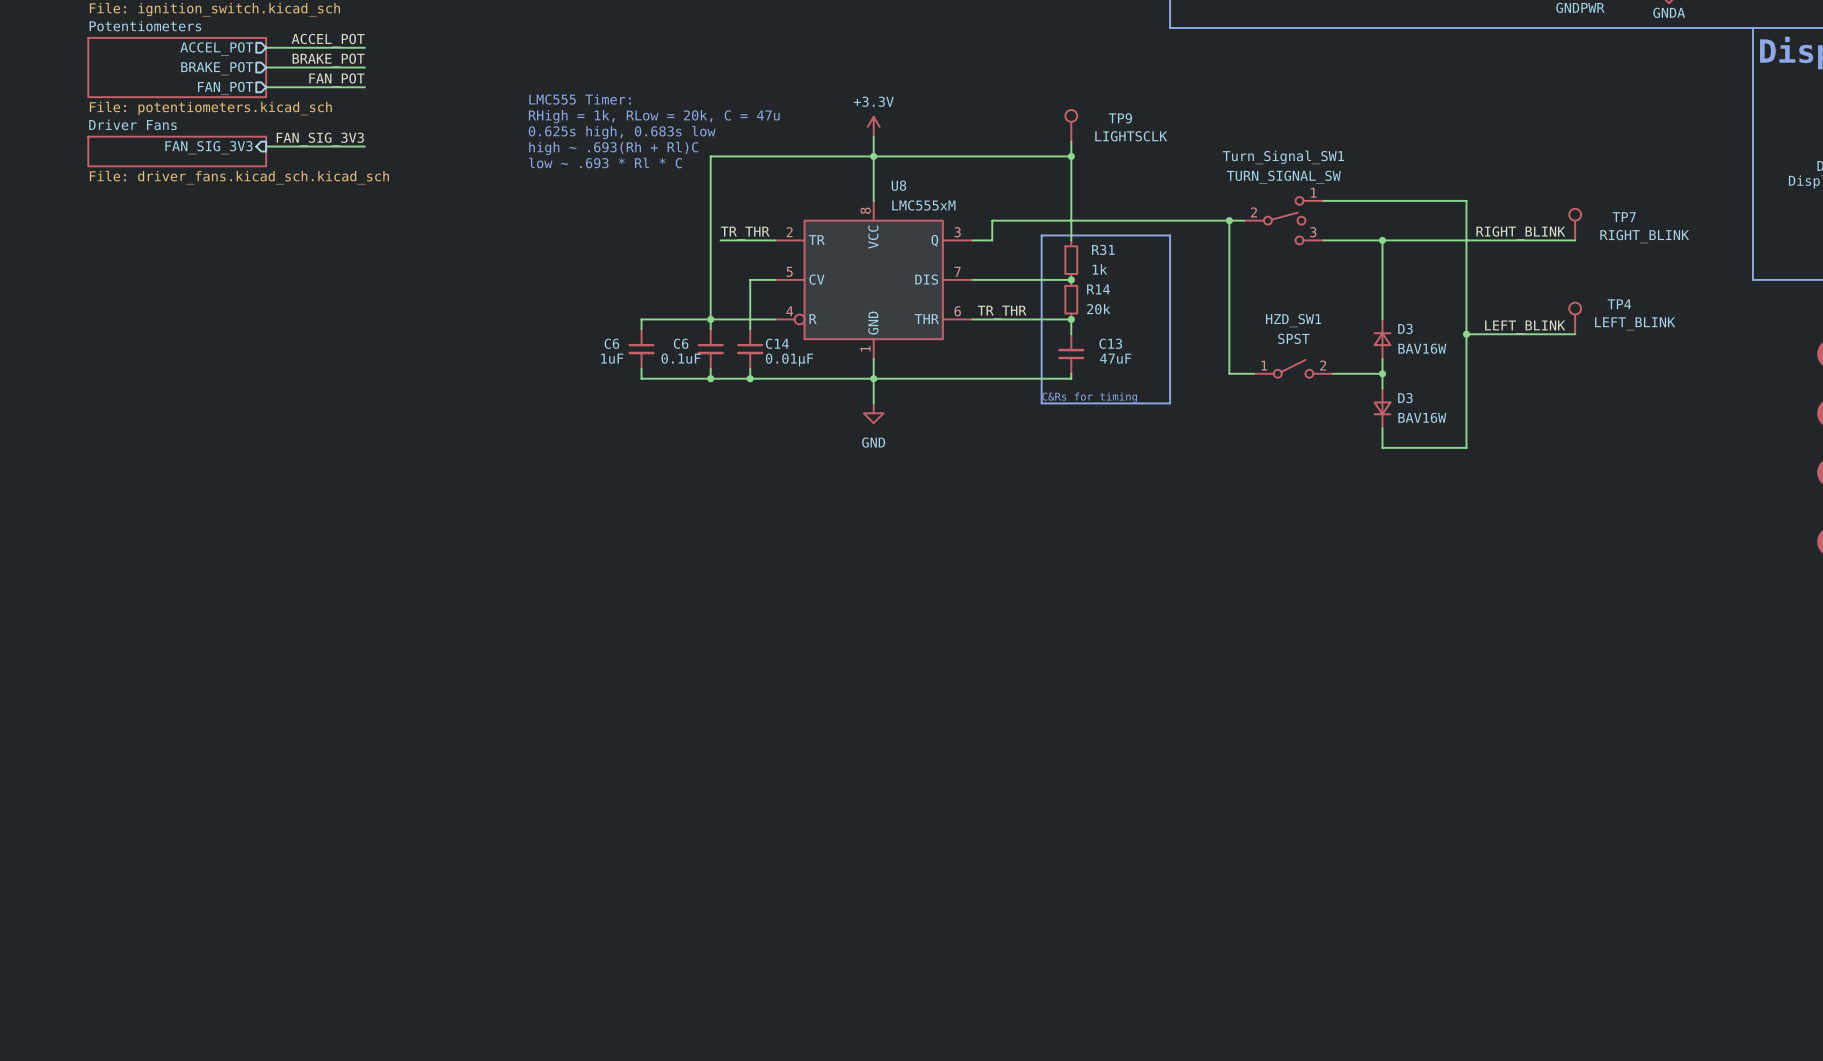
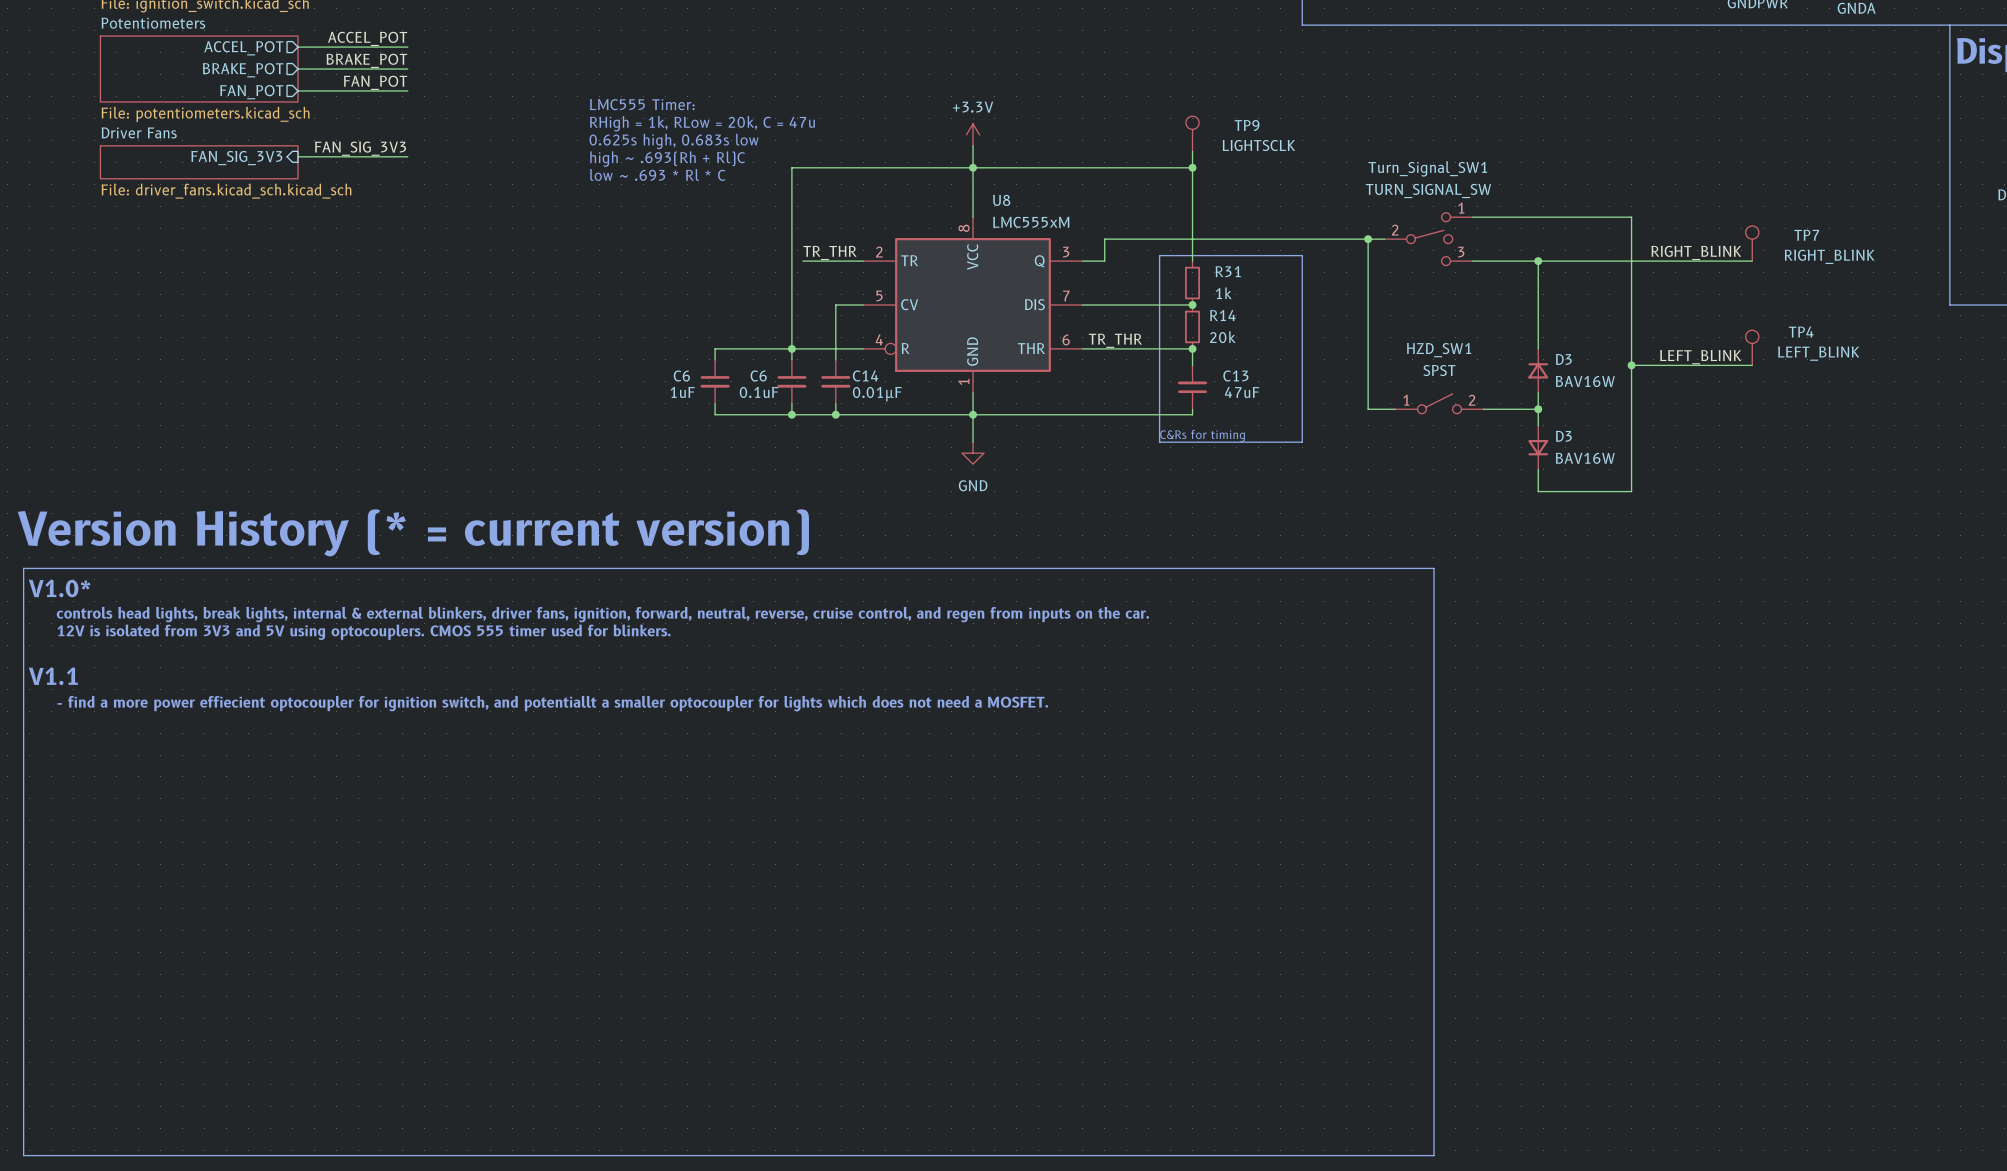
text: none -> Version History (* = current version) (413, 532)
line: none -> (23, 568) (1433, 568) (1433, 1155) (23, 1155) (23, 568)
text: none -> V1.0* (59, 588)
text: none -> controls head lights, break lights, internal & external blinkers, driver fans, ignition, forward, neutral, reverse, cruise control, and regen from inputs on the car. (602, 614)
text: none -> 12V is isolated from 3V3 and 5V using optocouplers. CMOS 555 timer used for blinkers. (364, 632)
text: none -> V1.1 (53, 676)
text: none -> - find a more power effiecient optocoupler for ignition switch, and potentiallt a smaller optocoupler for lights which does not need a MOSFET. (552, 703)

